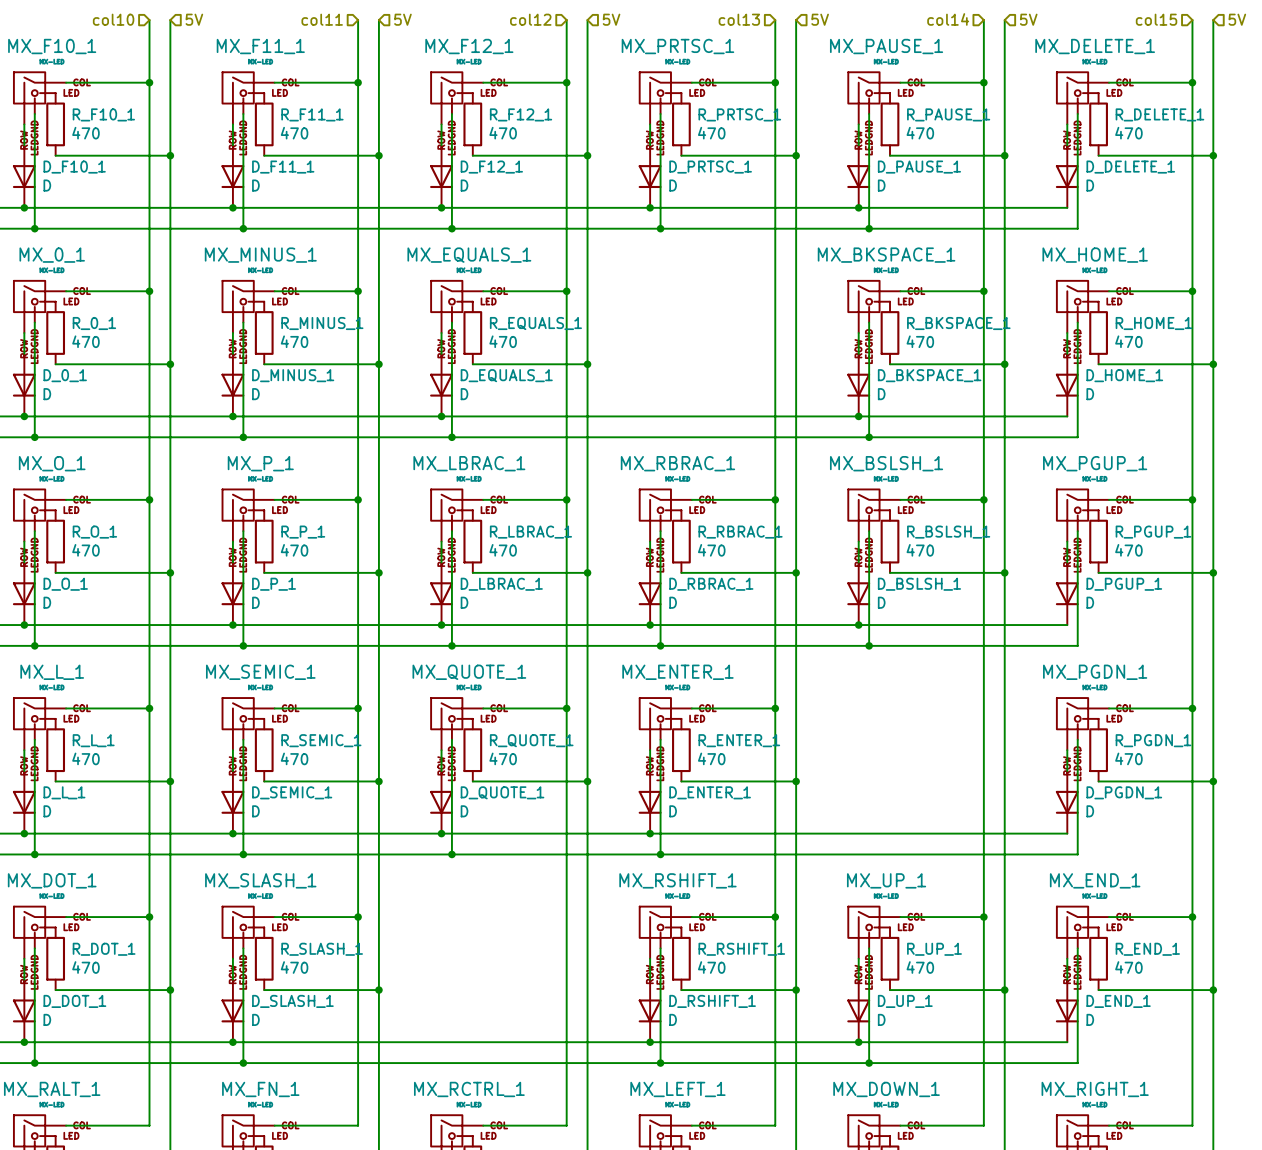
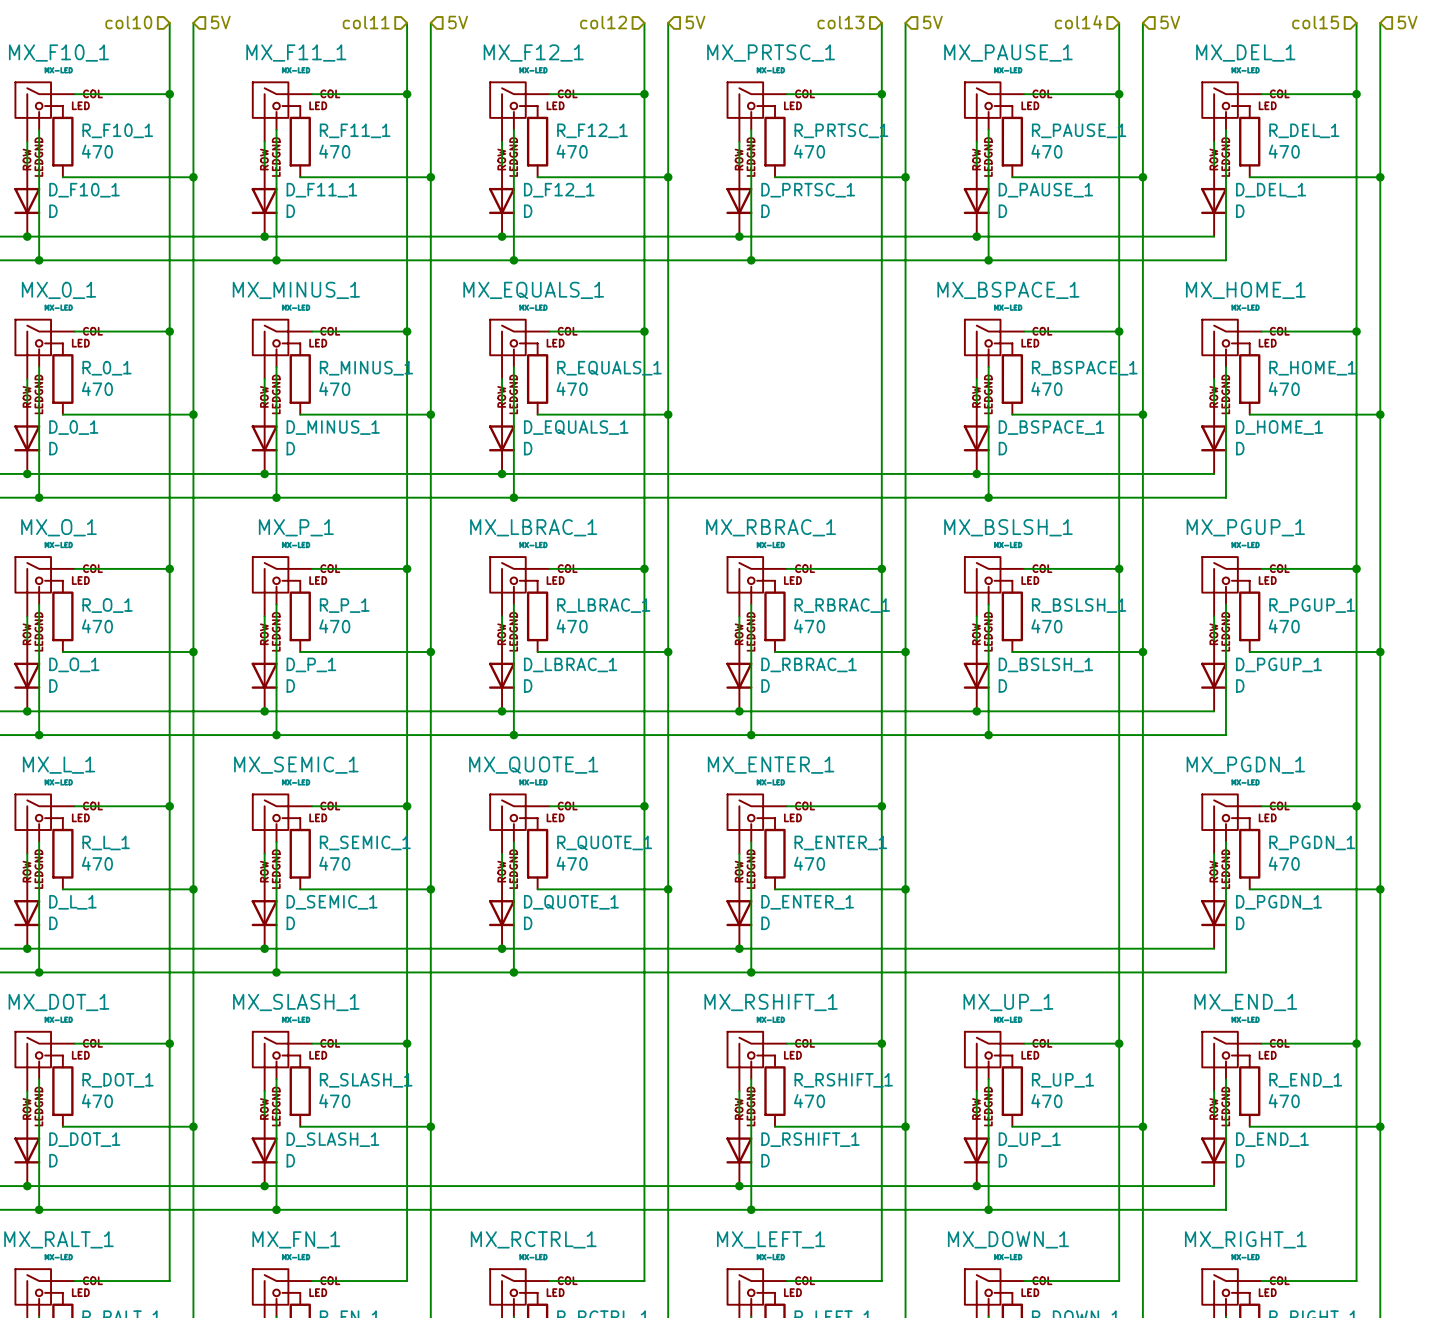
MX_DELETE_1 name: MX_DELETE_1 (1095, 46) -> MX_DEL_1 (1245, 53)
R_DELETE_1 name: R_DELETE_1 (1159, 114) -> R_DEL_1 (1304, 130)
D_DELETE_1 name: D_DELETE_1 (1130, 167) -> D_DEL_1 (1271, 190)
MX_BKSPACE_1 name: MX_BKSPACE_1 (886, 255) -> MX_BSPACE_1 (1008, 290)
R_BKSPACE_1 name: R_BKSPACE_1 (958, 323) -> R_BSPACE_1 (1084, 368)
D_BKSPACE_1 name: D_BKSPACE_1 (929, 375) -> D_BSPACE_1 (1051, 427)

